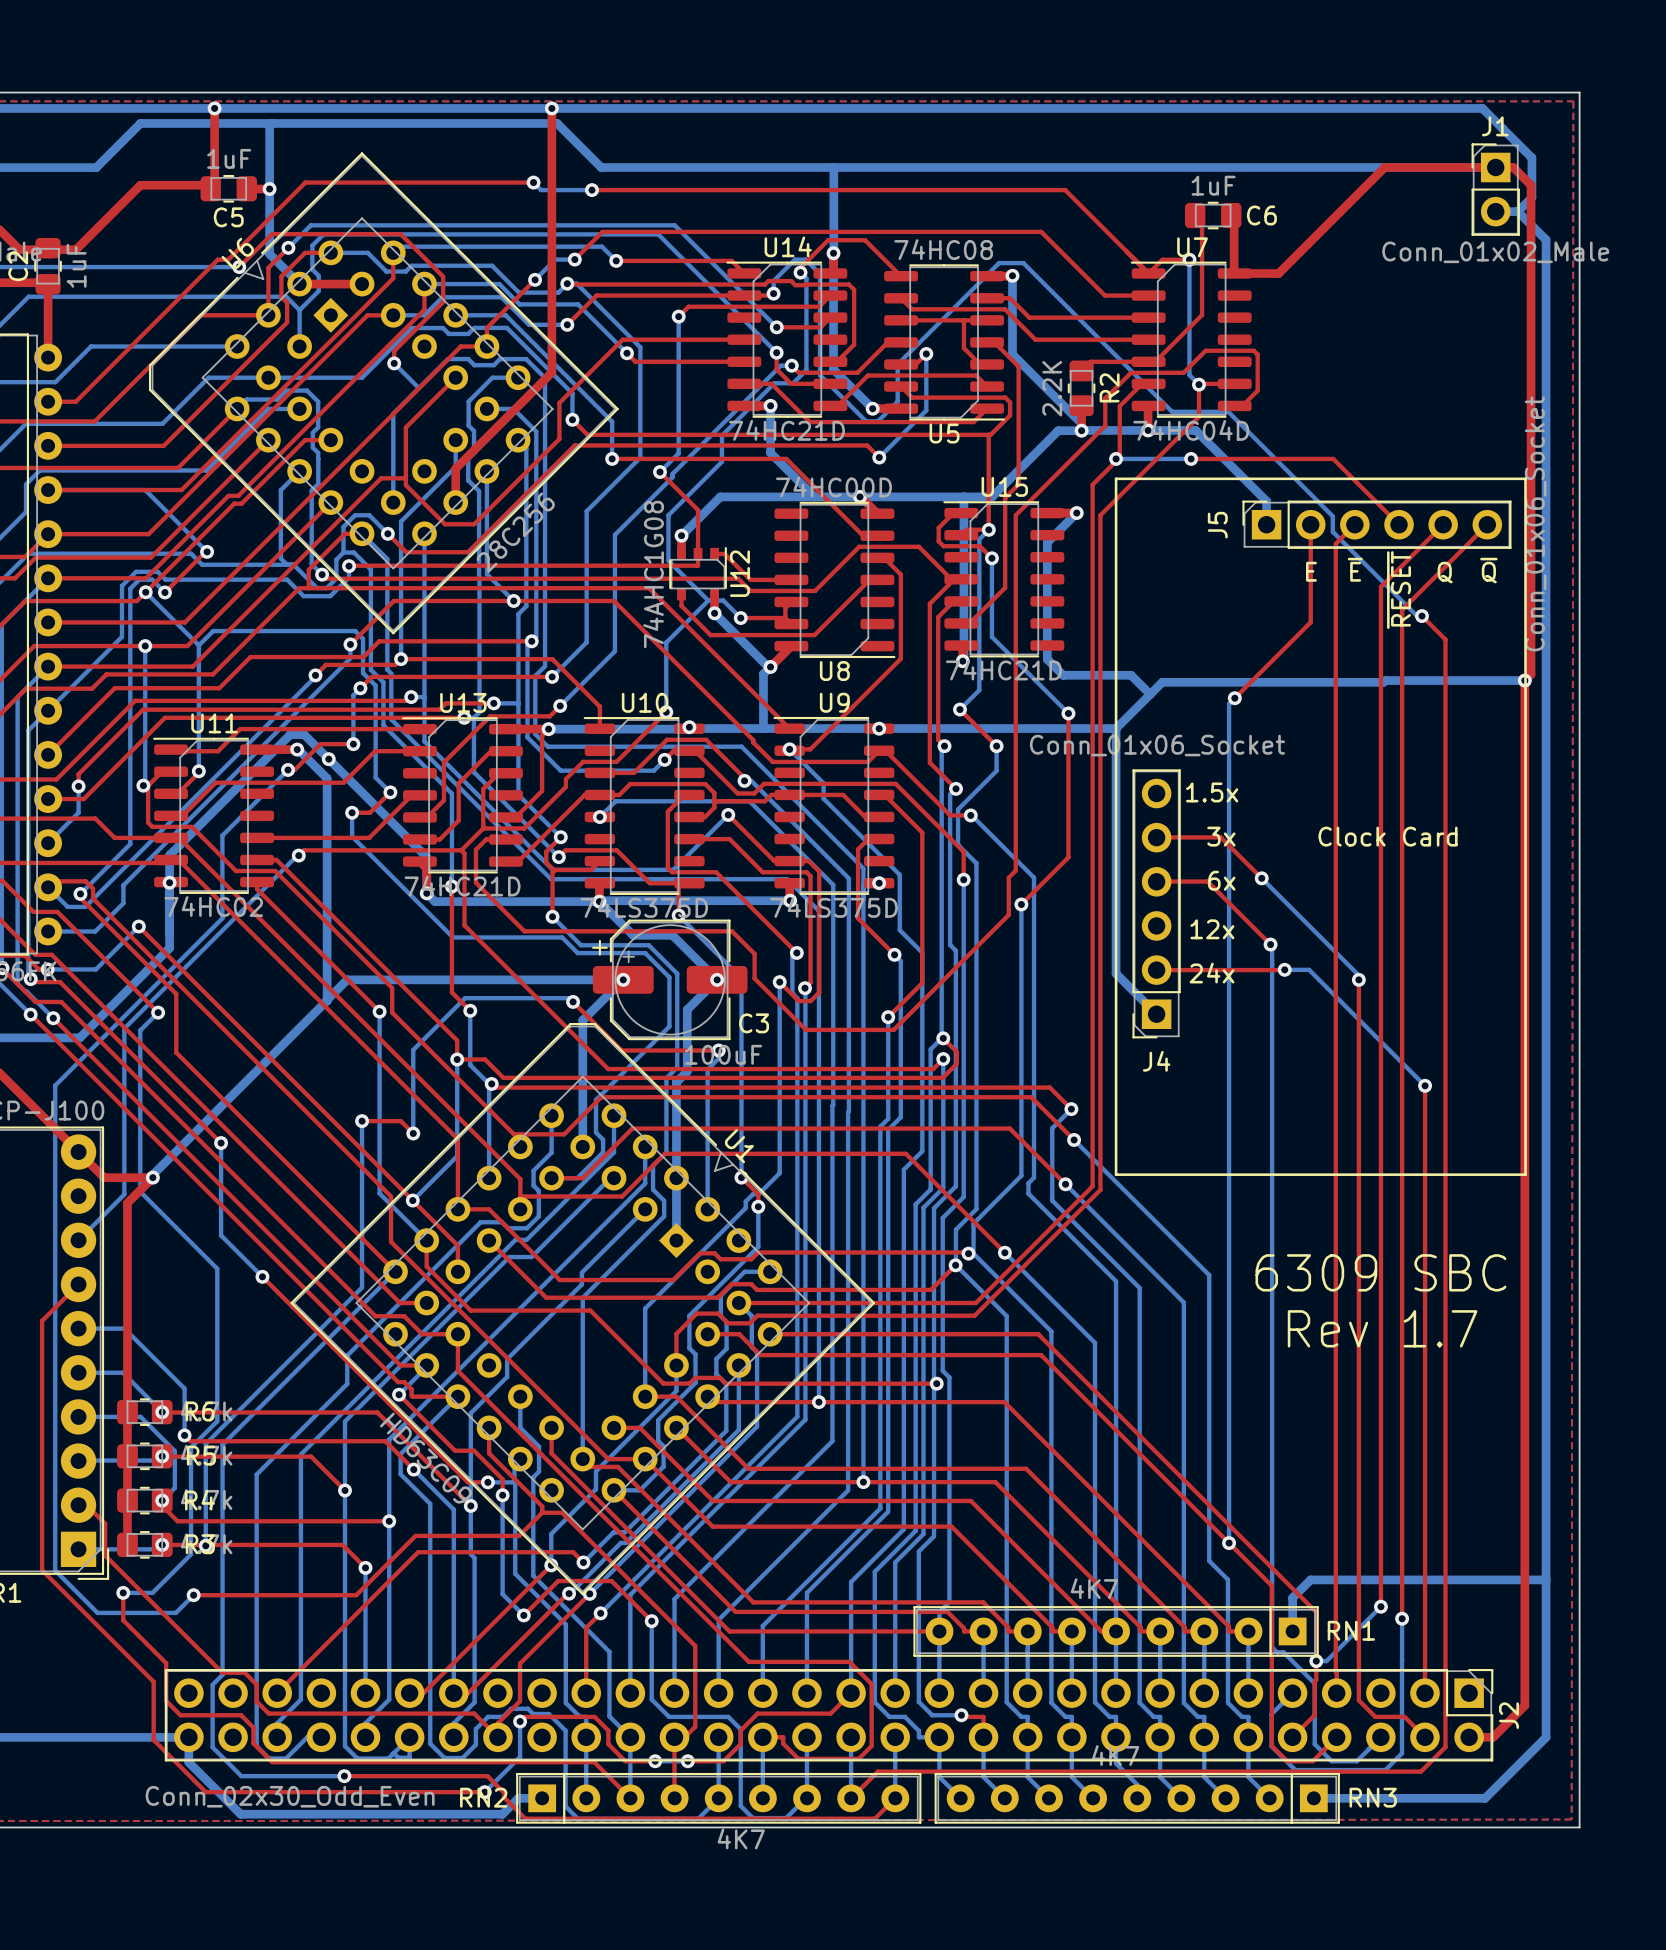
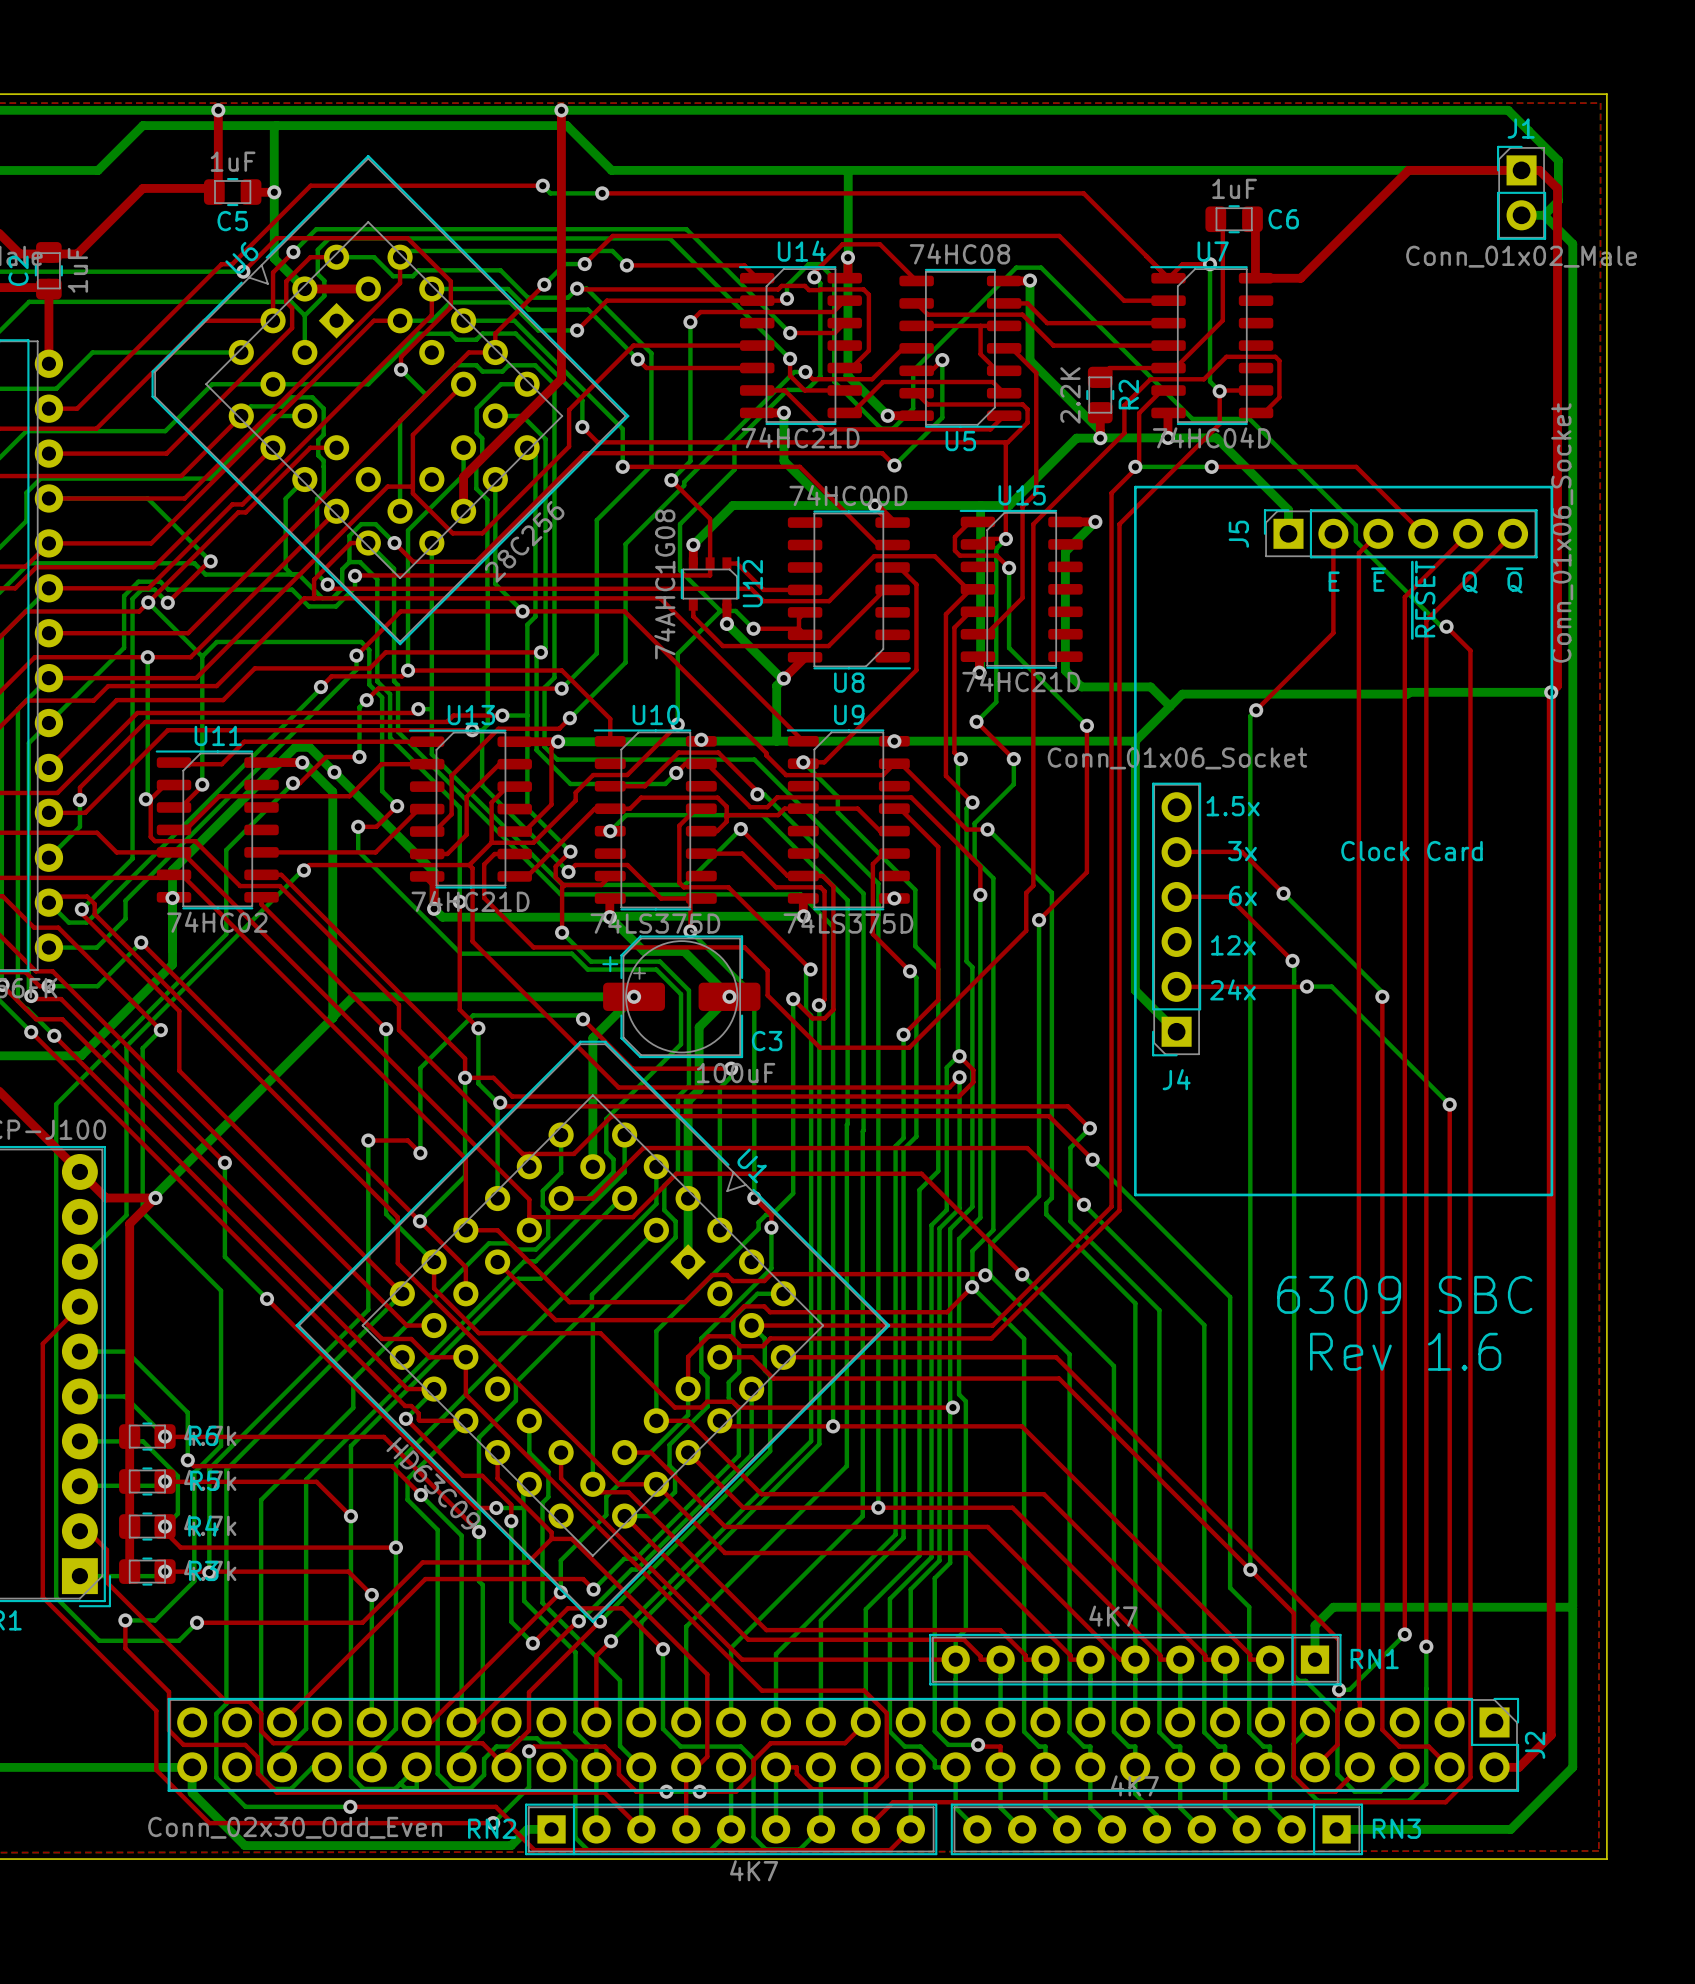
text: Rev 1.7 (1382, 1328) -> Rev 1.6 (1405, 1351)

